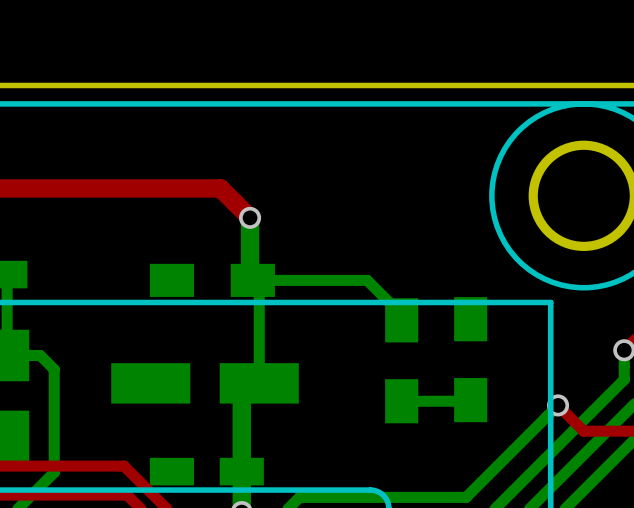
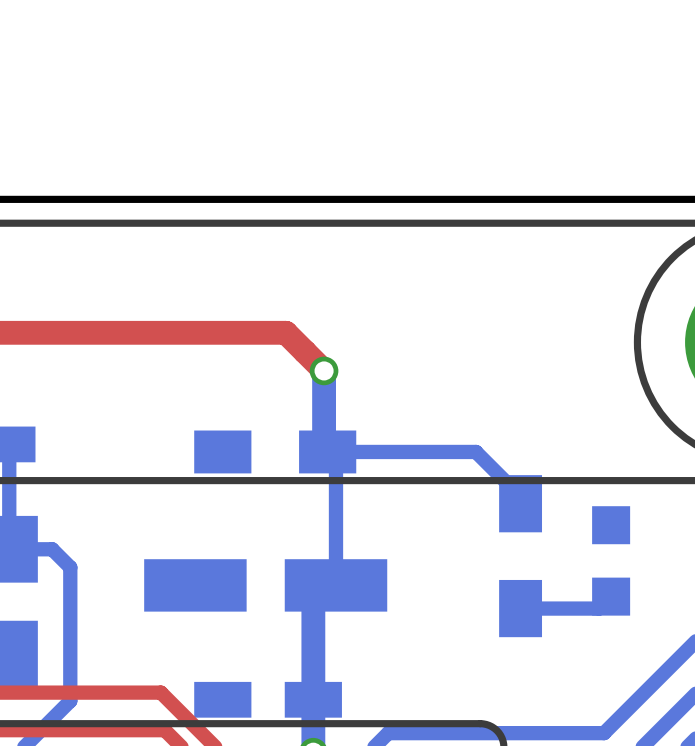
part footprint: [454, 297, 488, 423] -> [592, 506, 631, 616]

